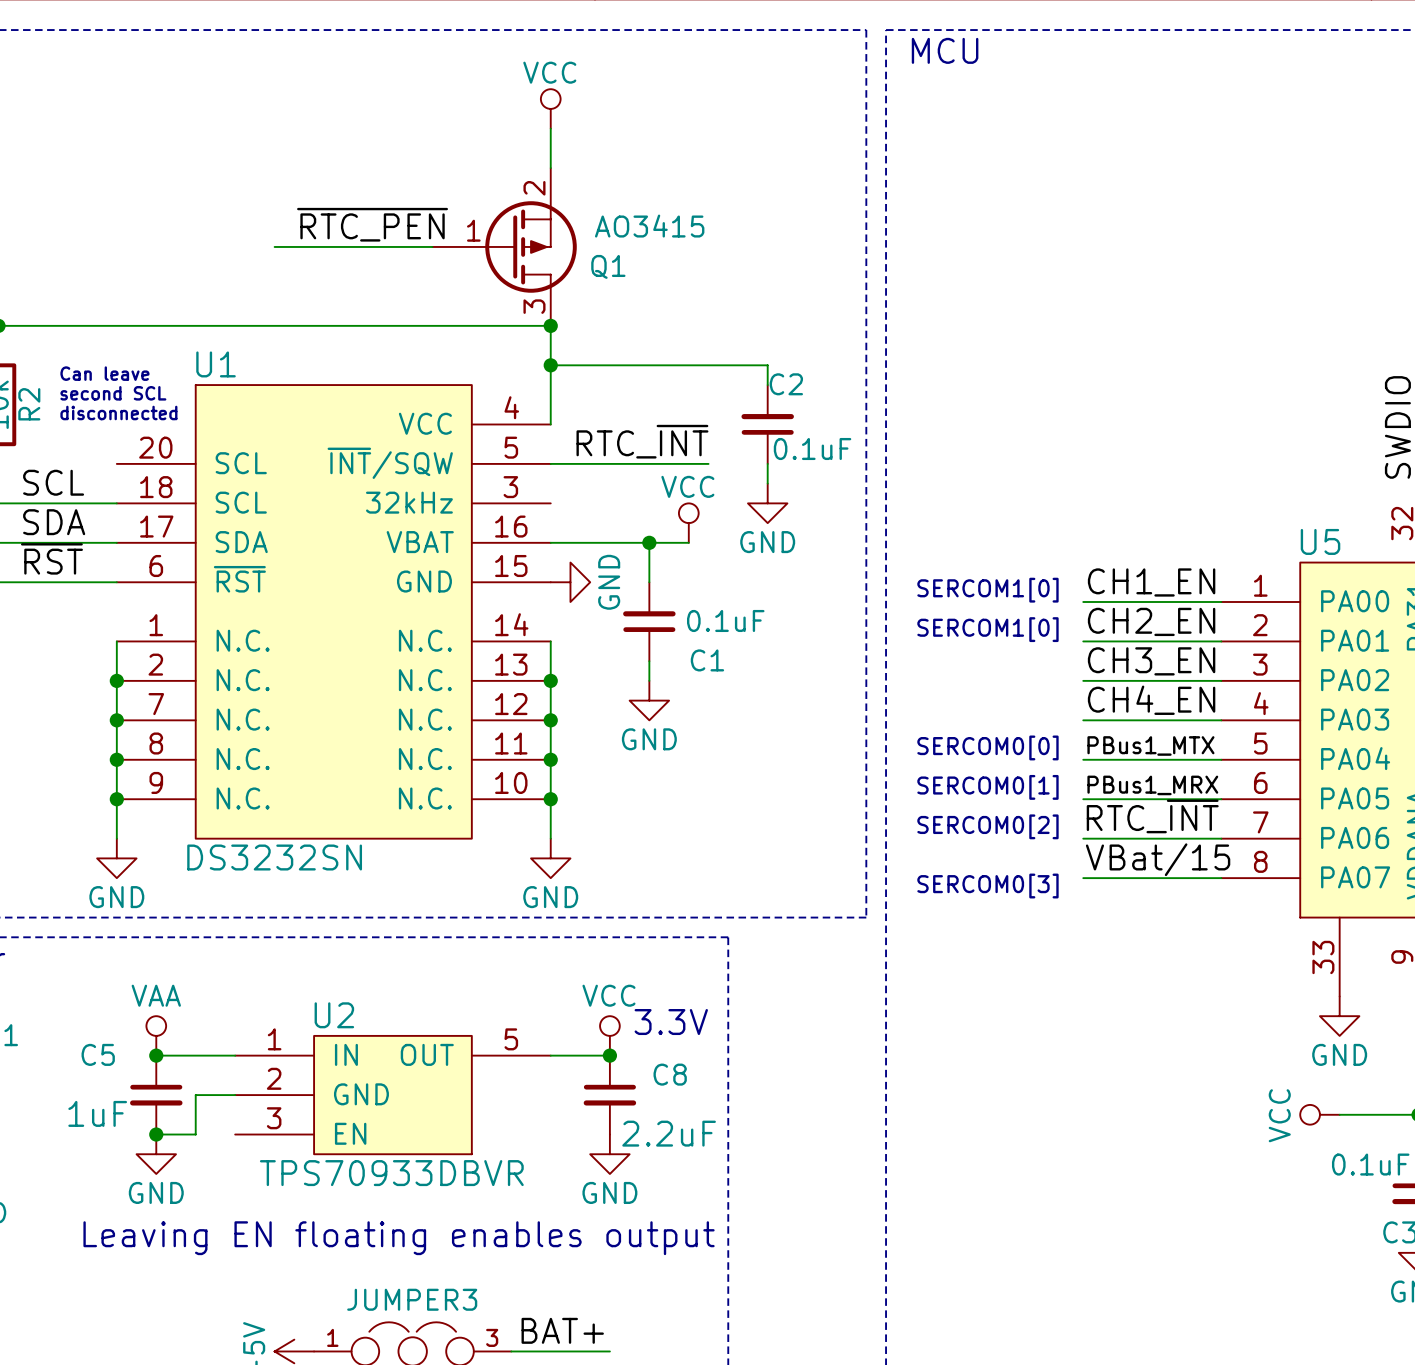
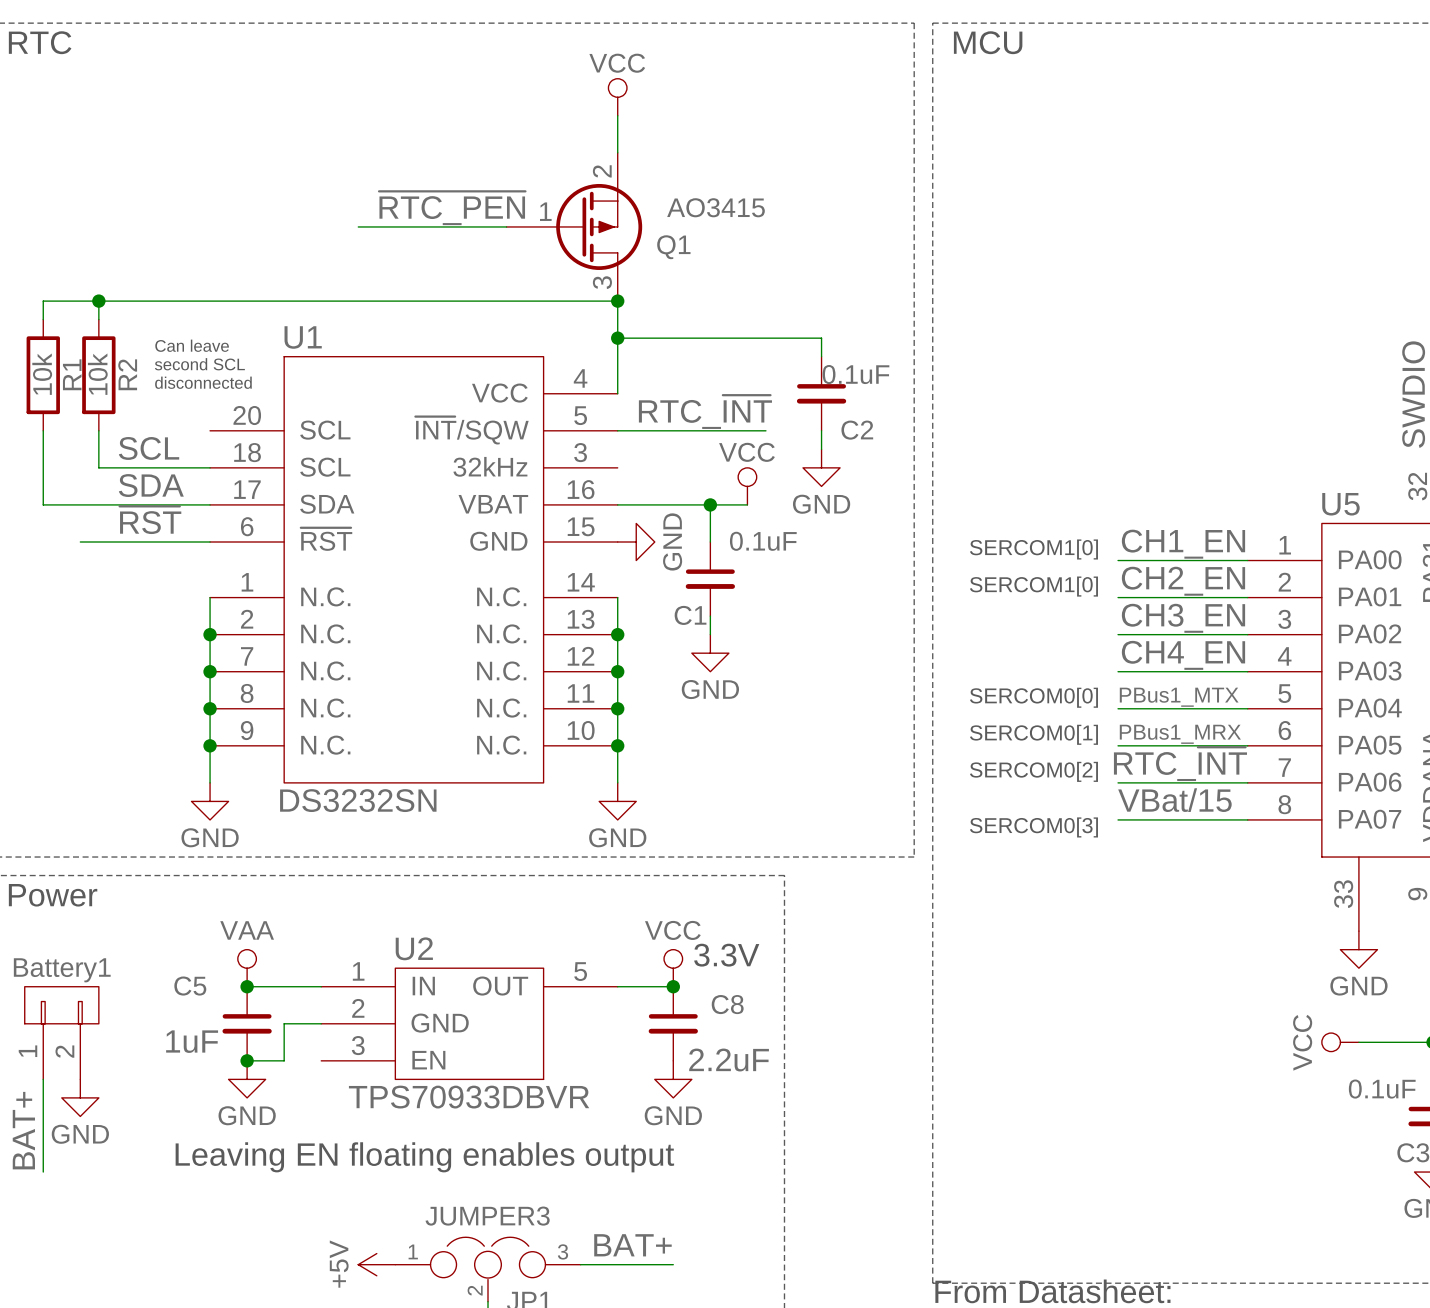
C2 name position: C2 (786, 384) -> C2 (857, 430)
C2 rotation: 0° (767, 424) -> 180° (821, 393)
C2 value position: 0.1uF (812, 449) -> 0.1uF (855, 374)
C1 value position: 0.1uF (725, 620) -> 0.1uF (763, 541)
C1 rotation: 0° (649, 621) -> 180° (710, 579)
C1 name position: C1 (707, 660) -> C1 (690, 615)

